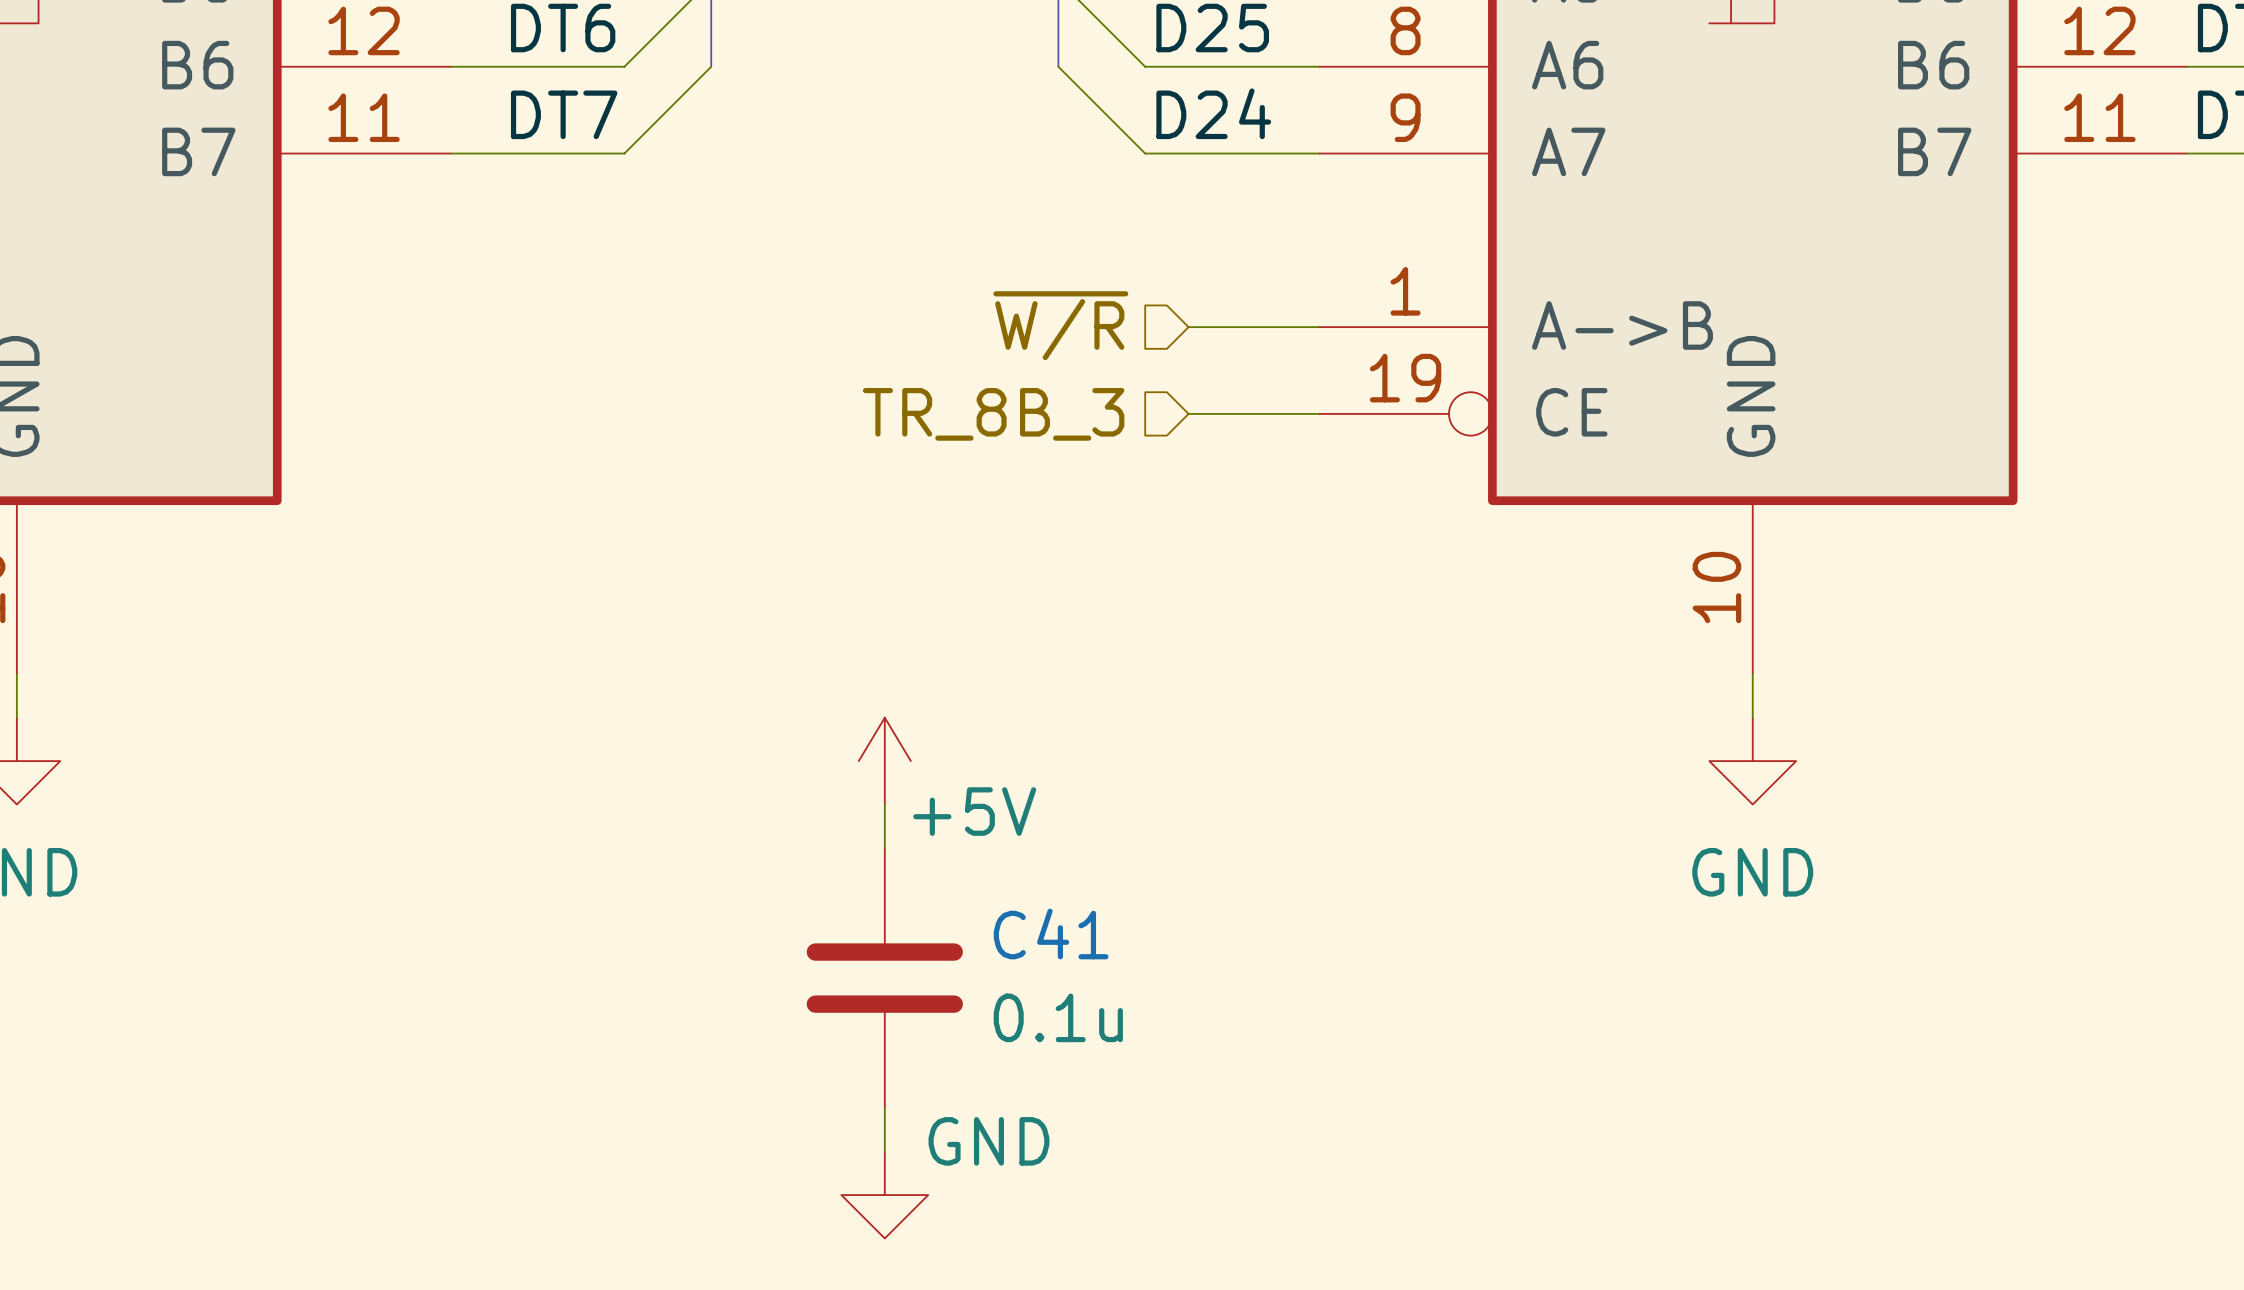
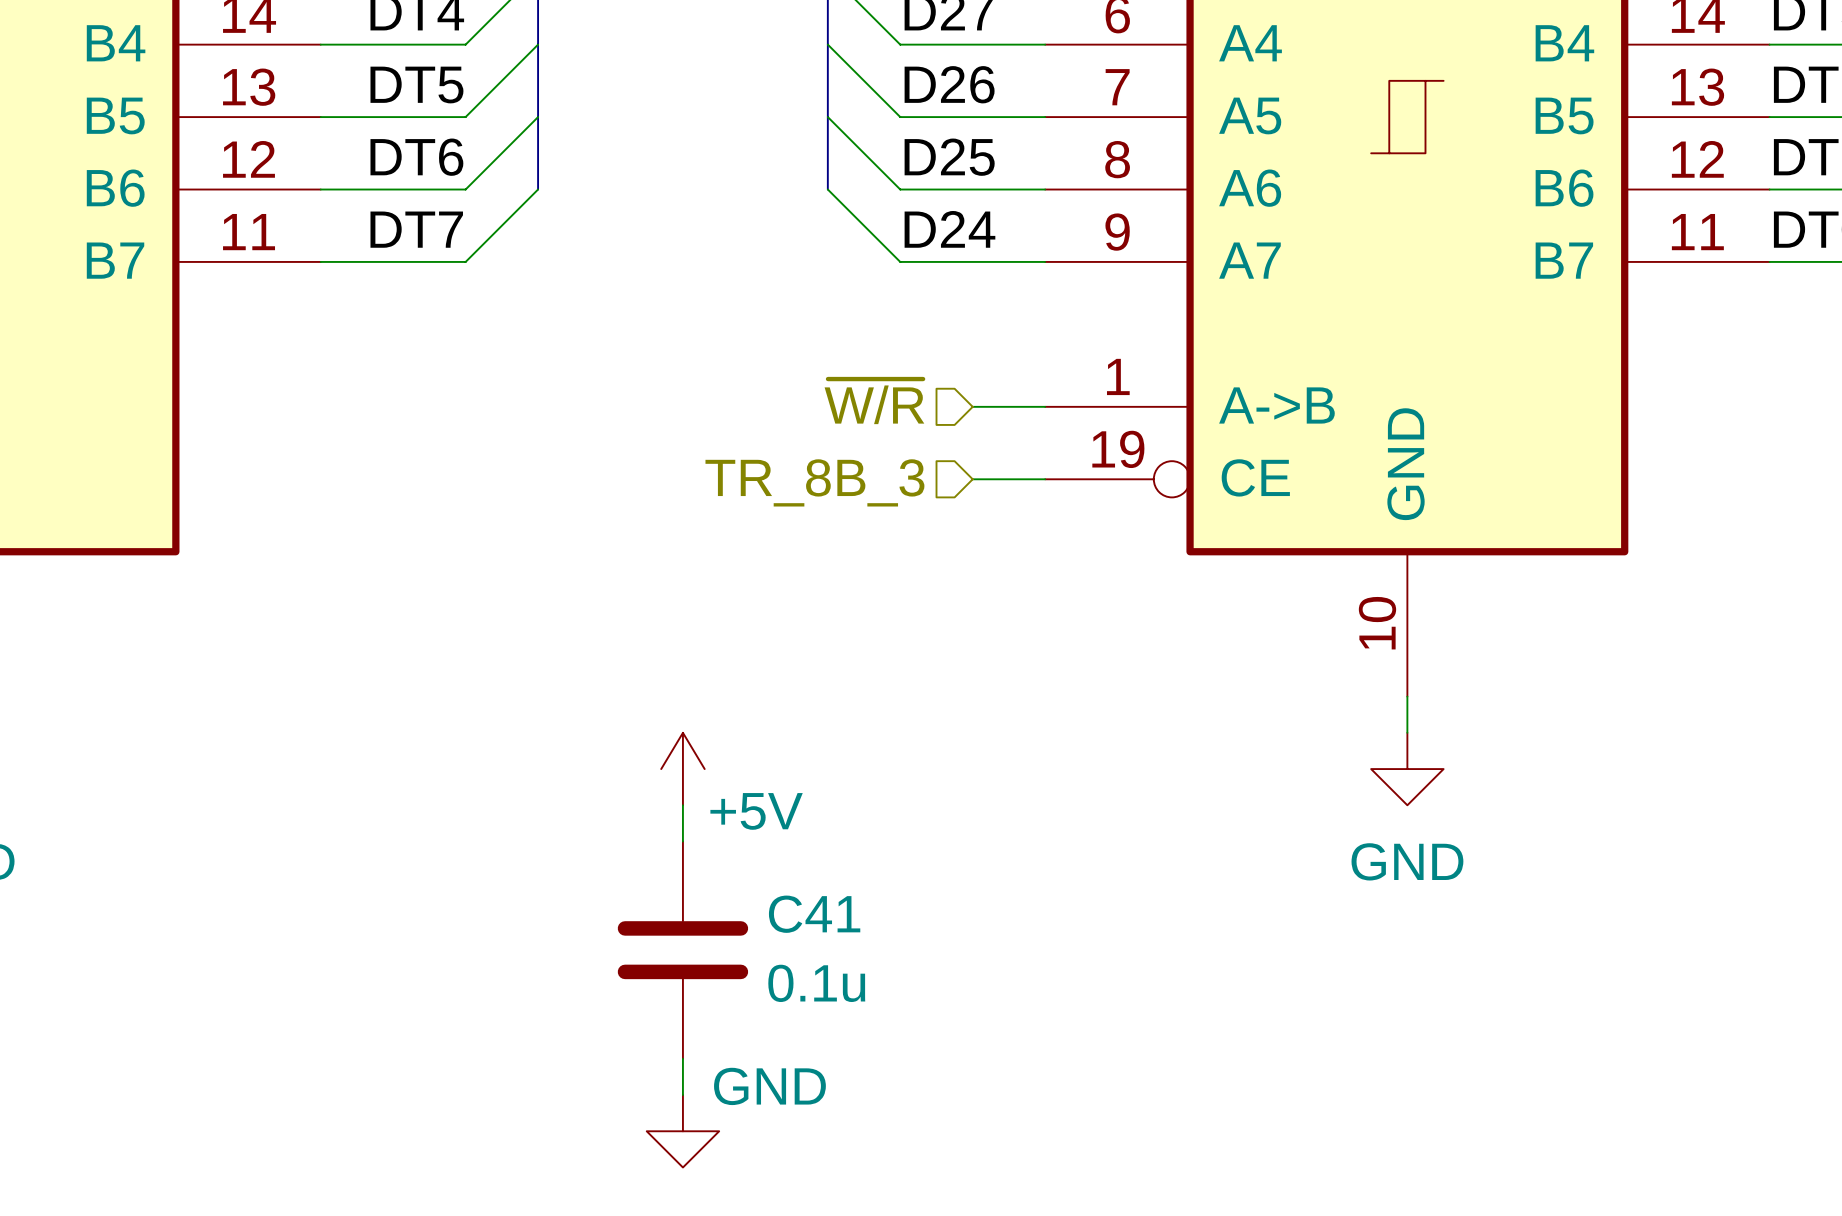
hierarchical label position: ~{W/R} (1060, 325) -> ~{W/R} (874, 401)
wire: (1188, 327) (1231, 327) -> none
wire: (1188, 413) (1231, 413) -> none
hierarchical label position: TR_8B_3 (993, 414) -> TR_8B_3 (814, 482)

